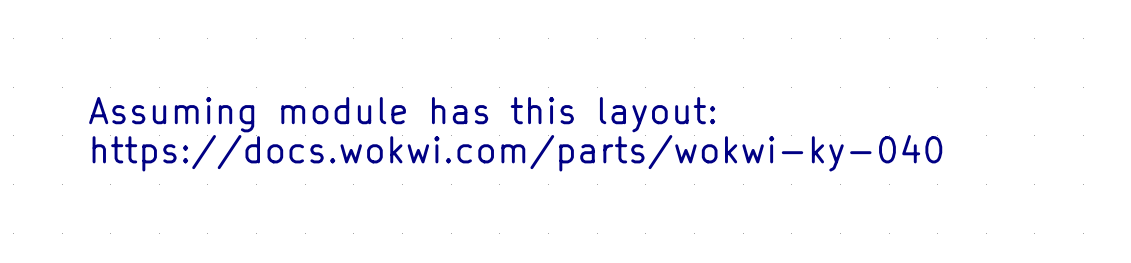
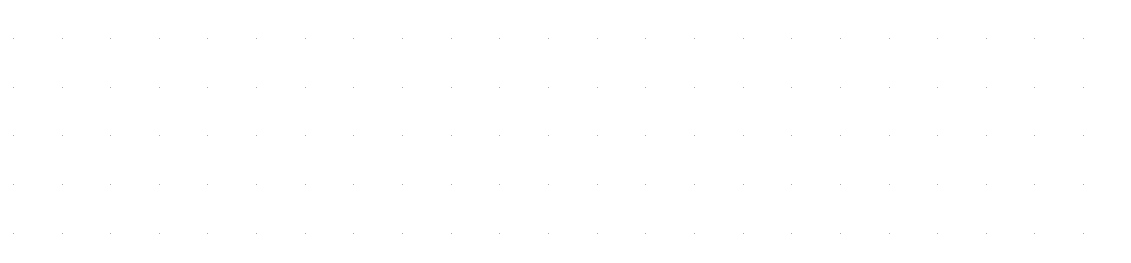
text: Assuming module has this layout: (402, 114) -> none
text: https://docs.wokwi.com/parts/wokwi-ky-040 (517, 153) -> none

